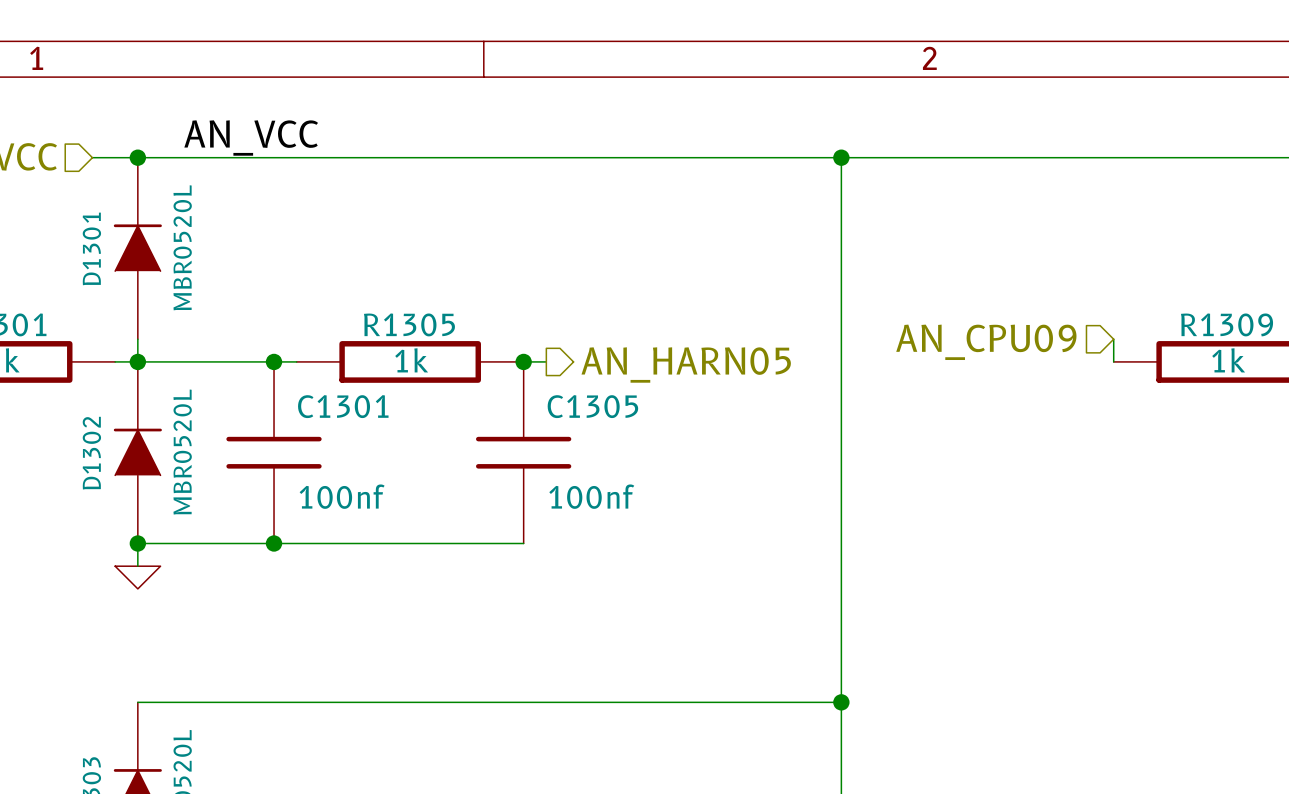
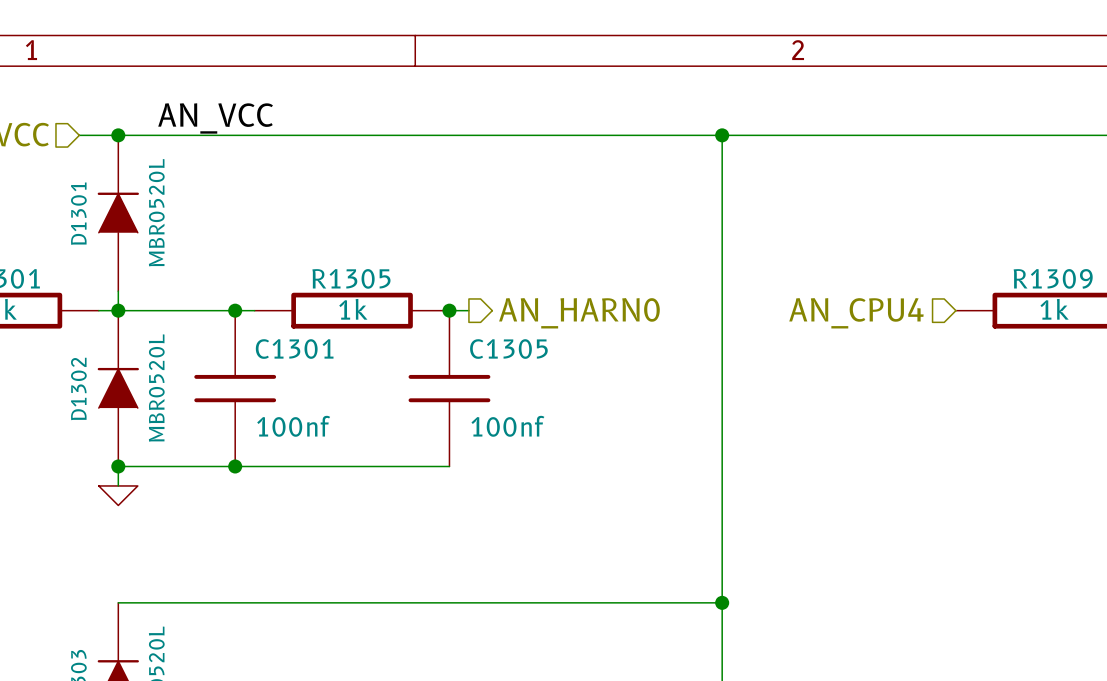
wire: (1113, 339) (1113, 361) -> none
hierarchical label: AN_CPU09 (986, 342) -> AN_CPU4 (856, 313)
hierarchical label: AN_HARN05 (686, 365) -> AN_HARN0 (579, 313)

